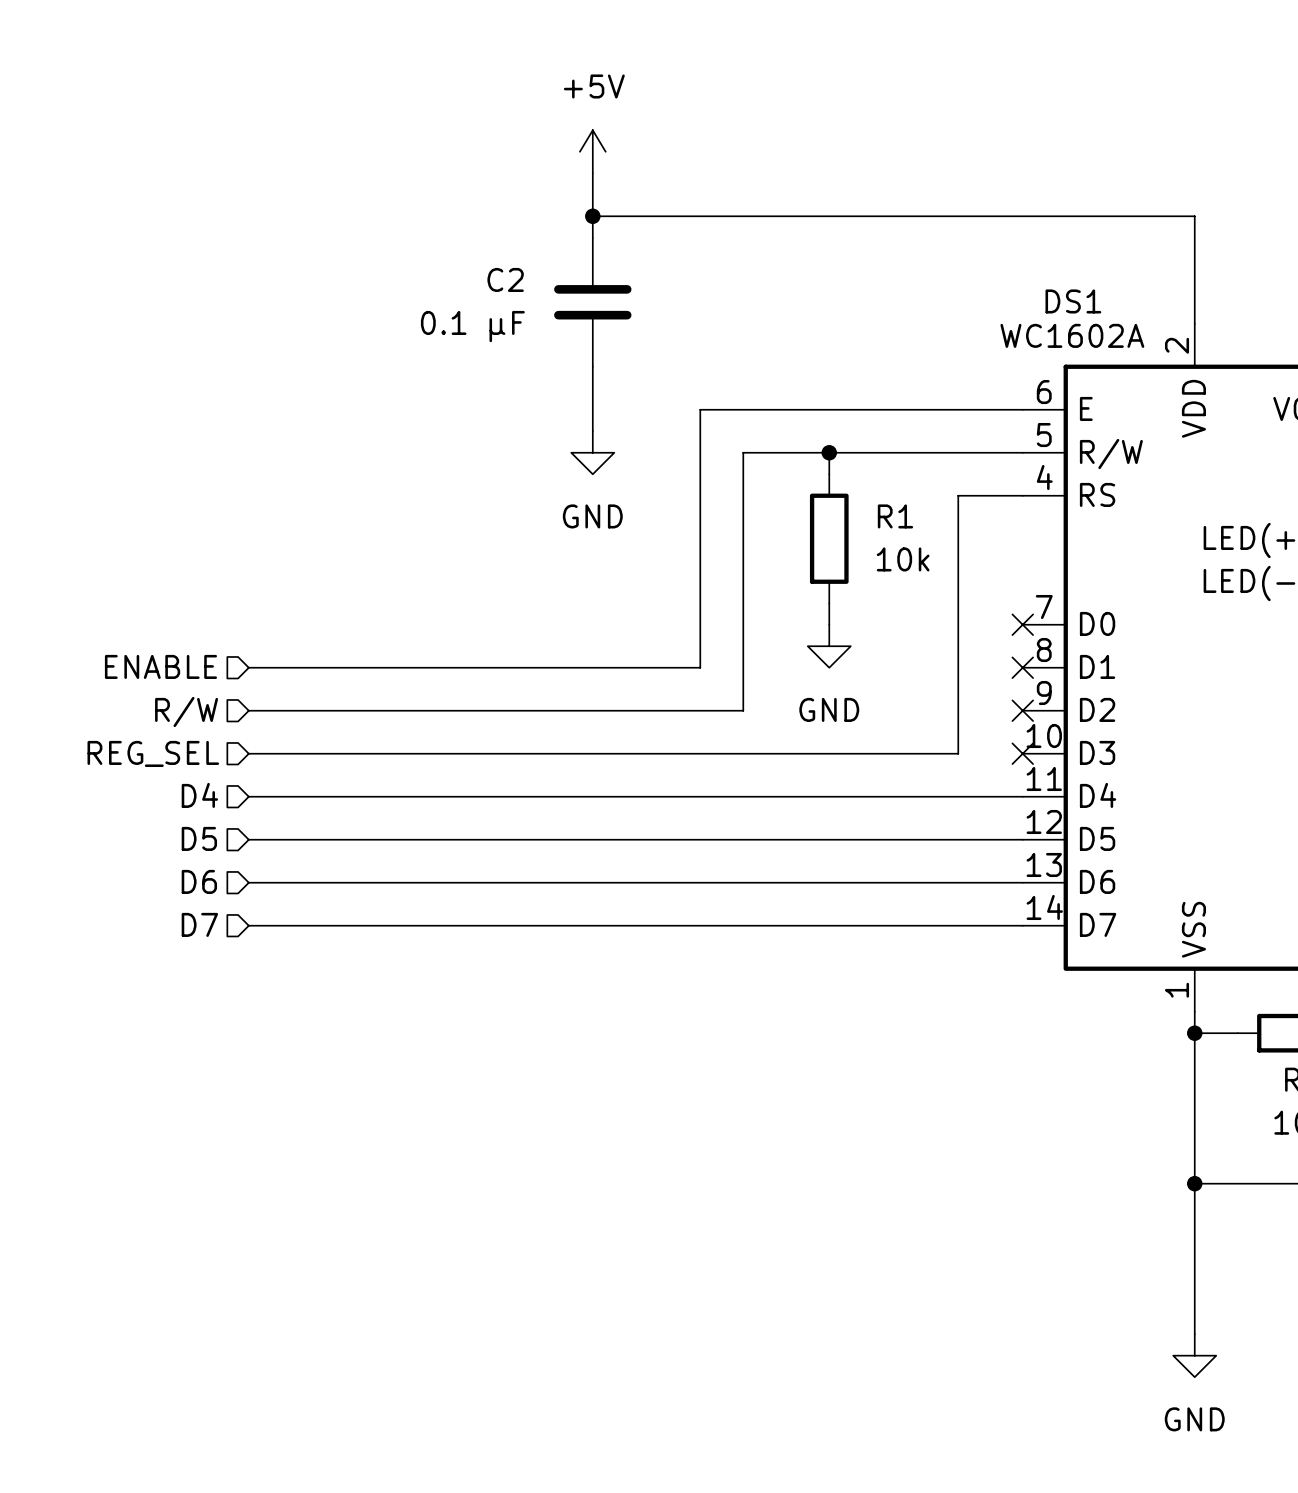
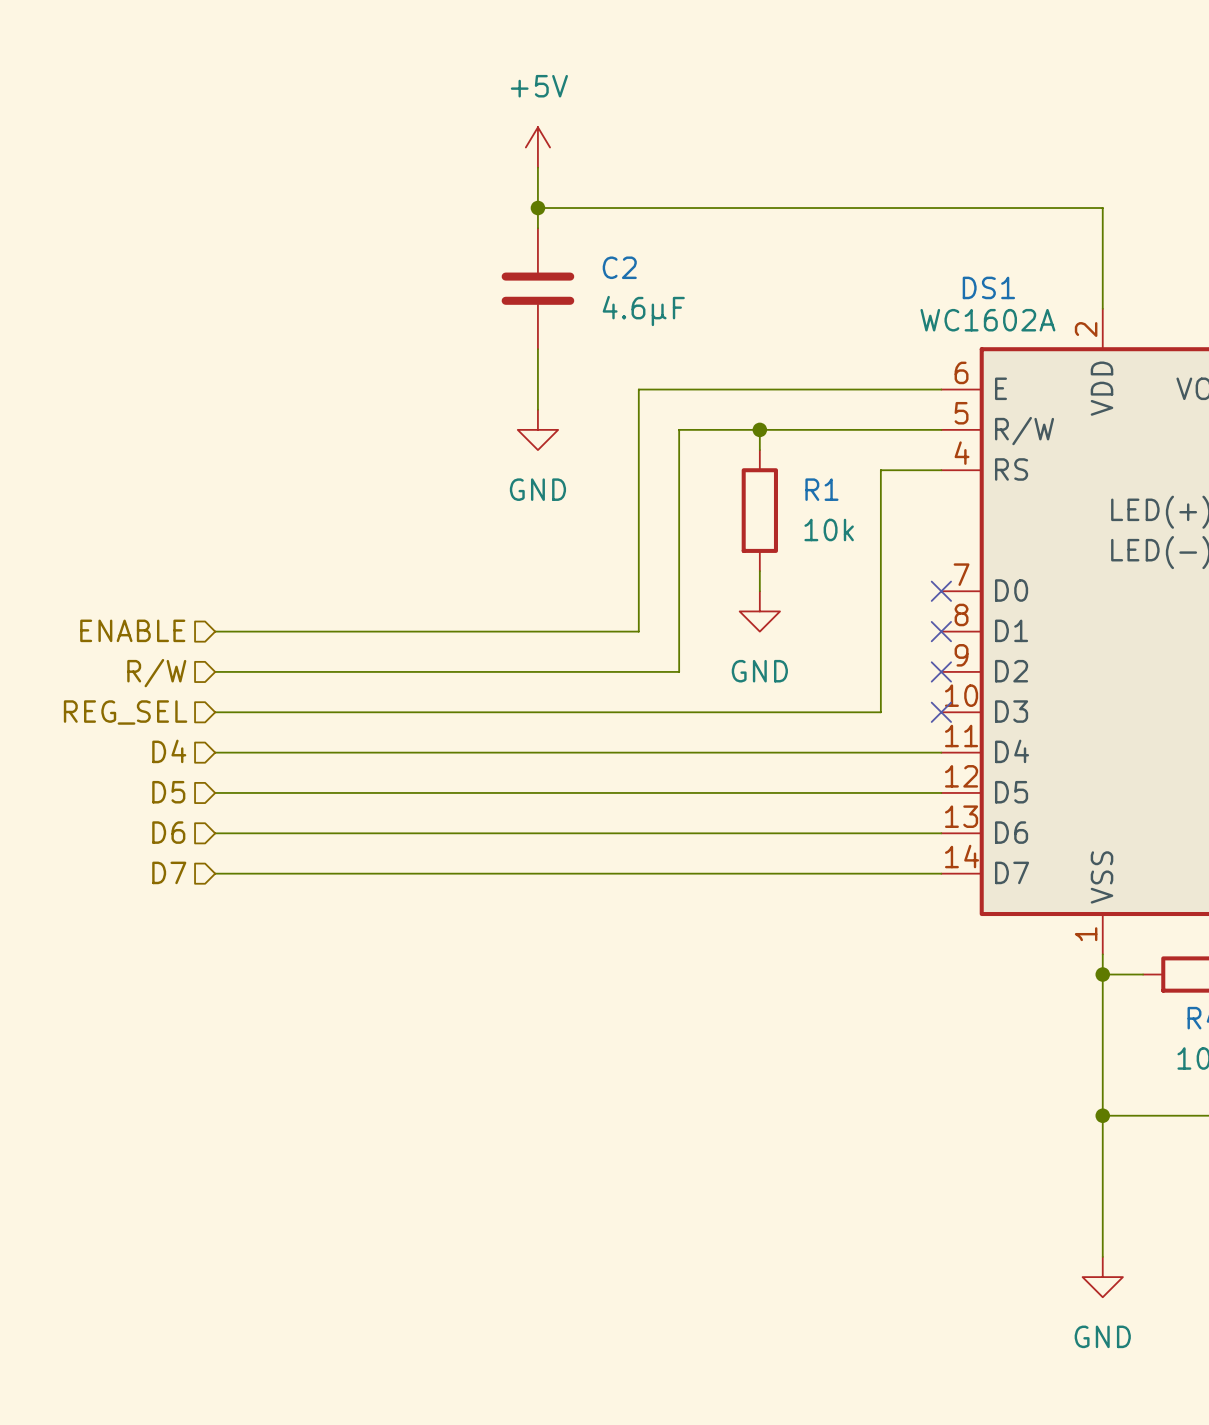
C2 name position: C2 (505, 279) -> C2 (619, 267)
C2 value: 0.1 µF (472, 326) -> 4.6µF (643, 310)

